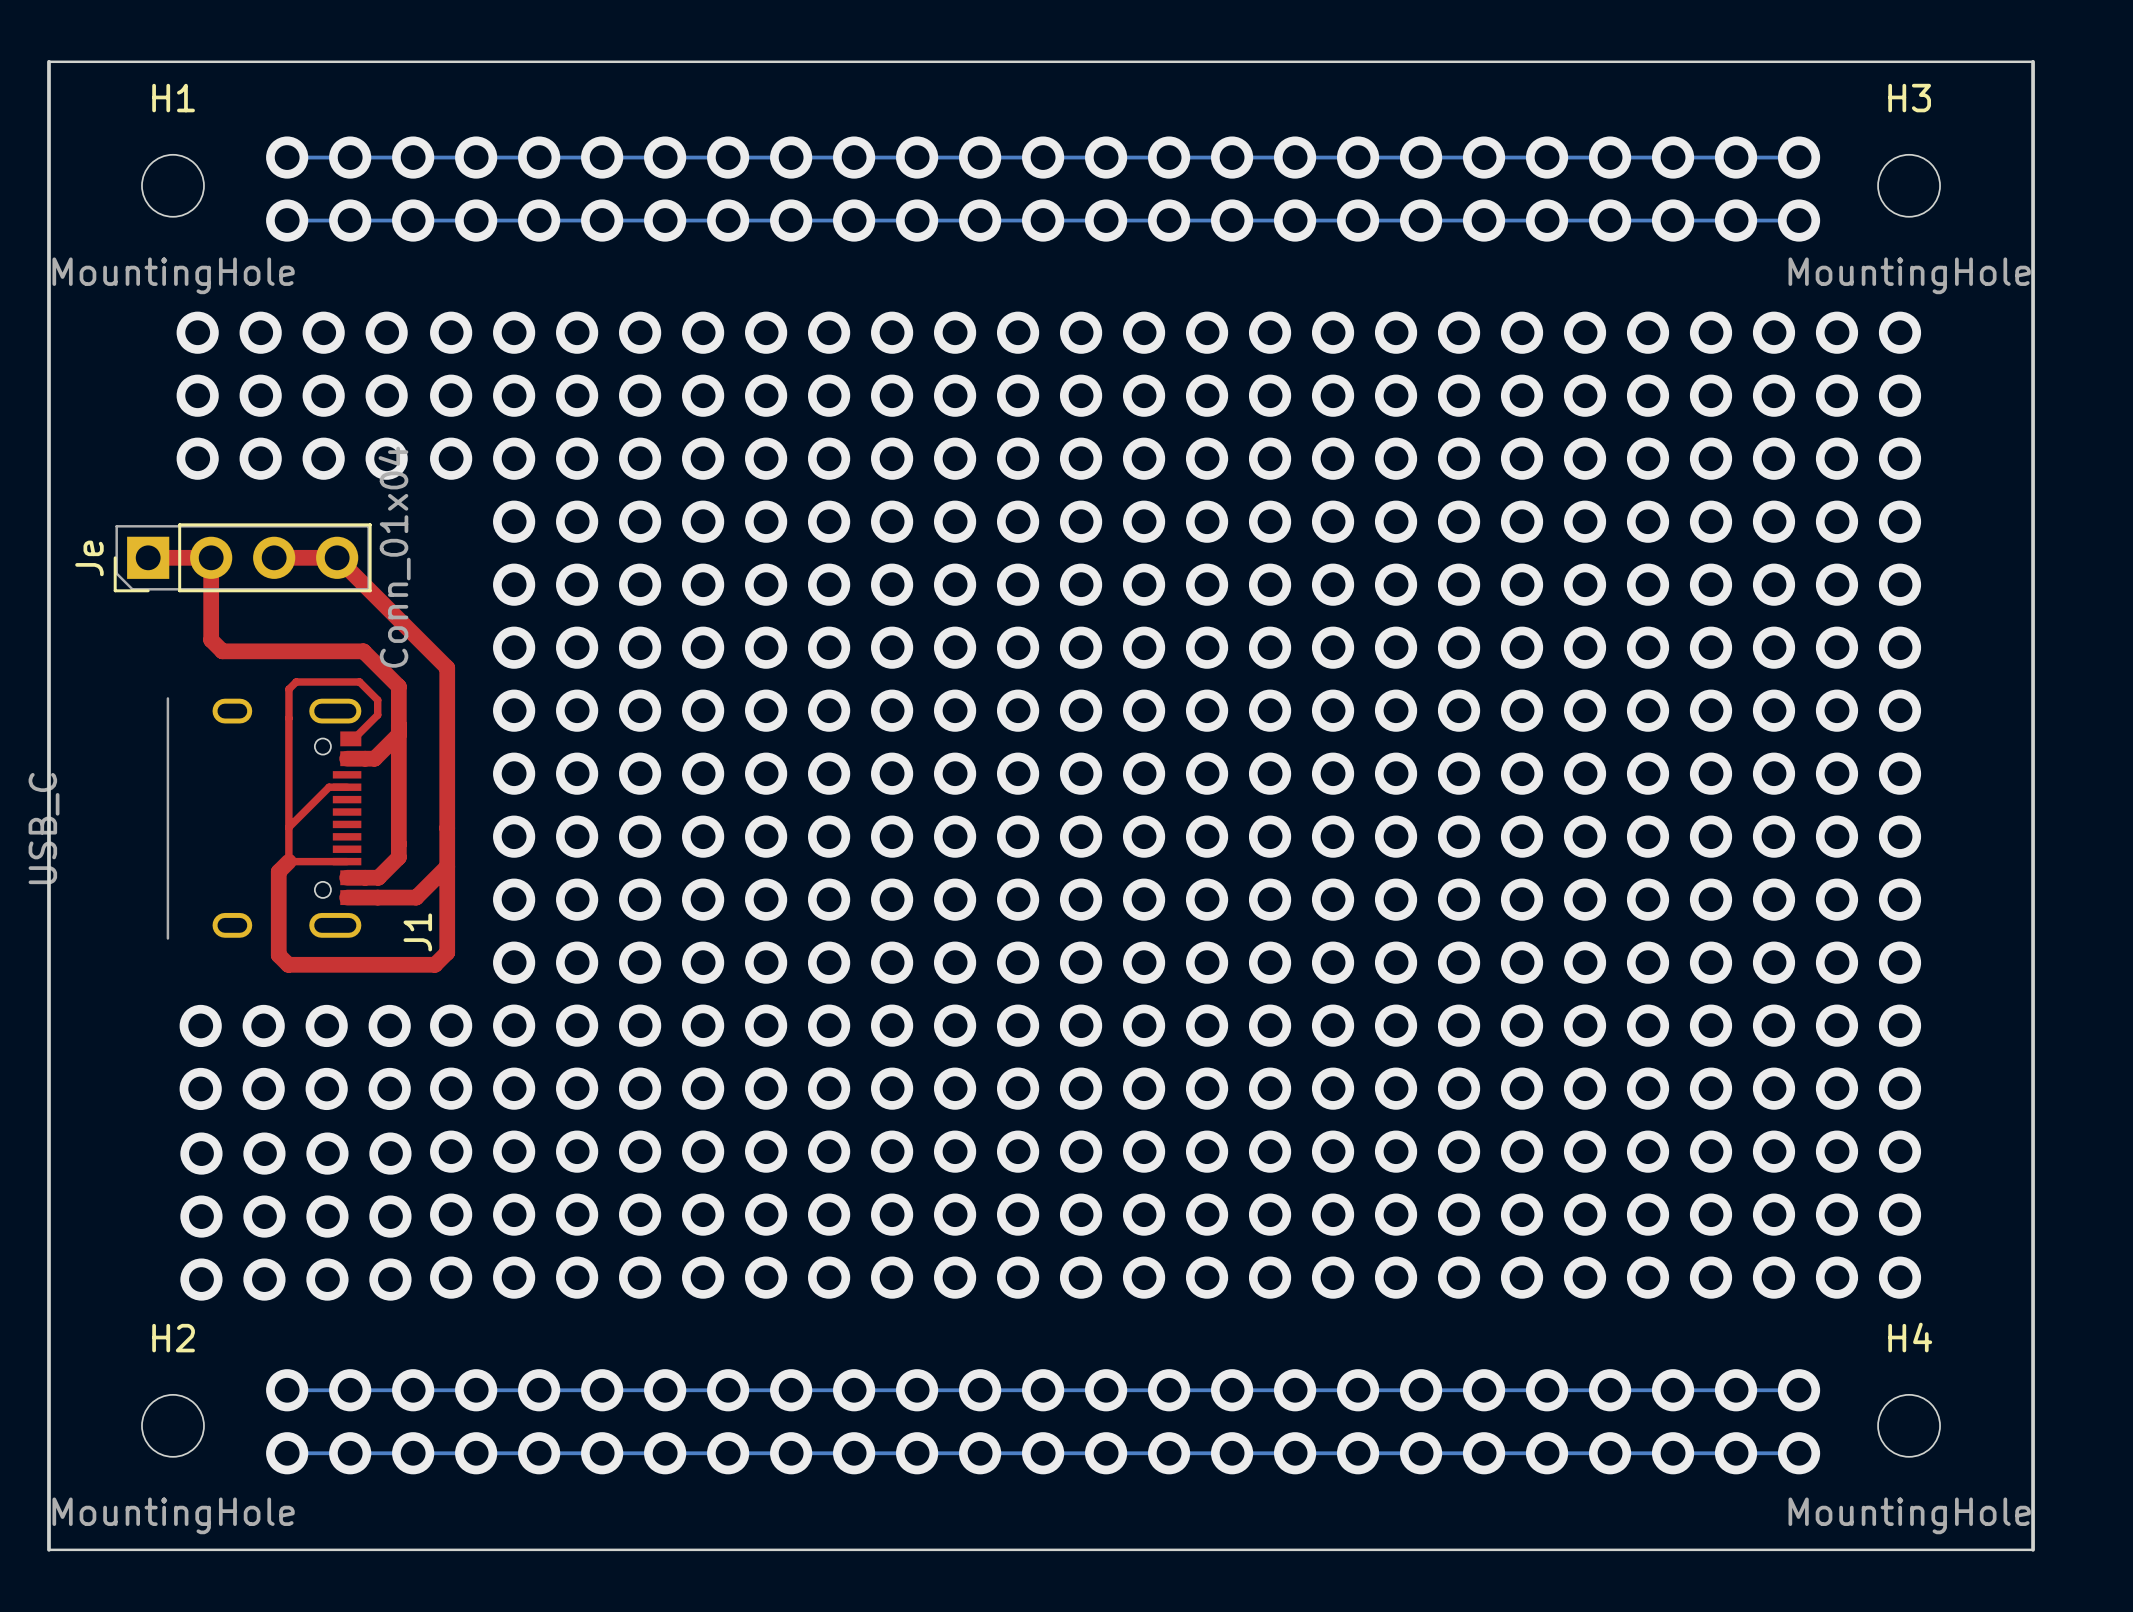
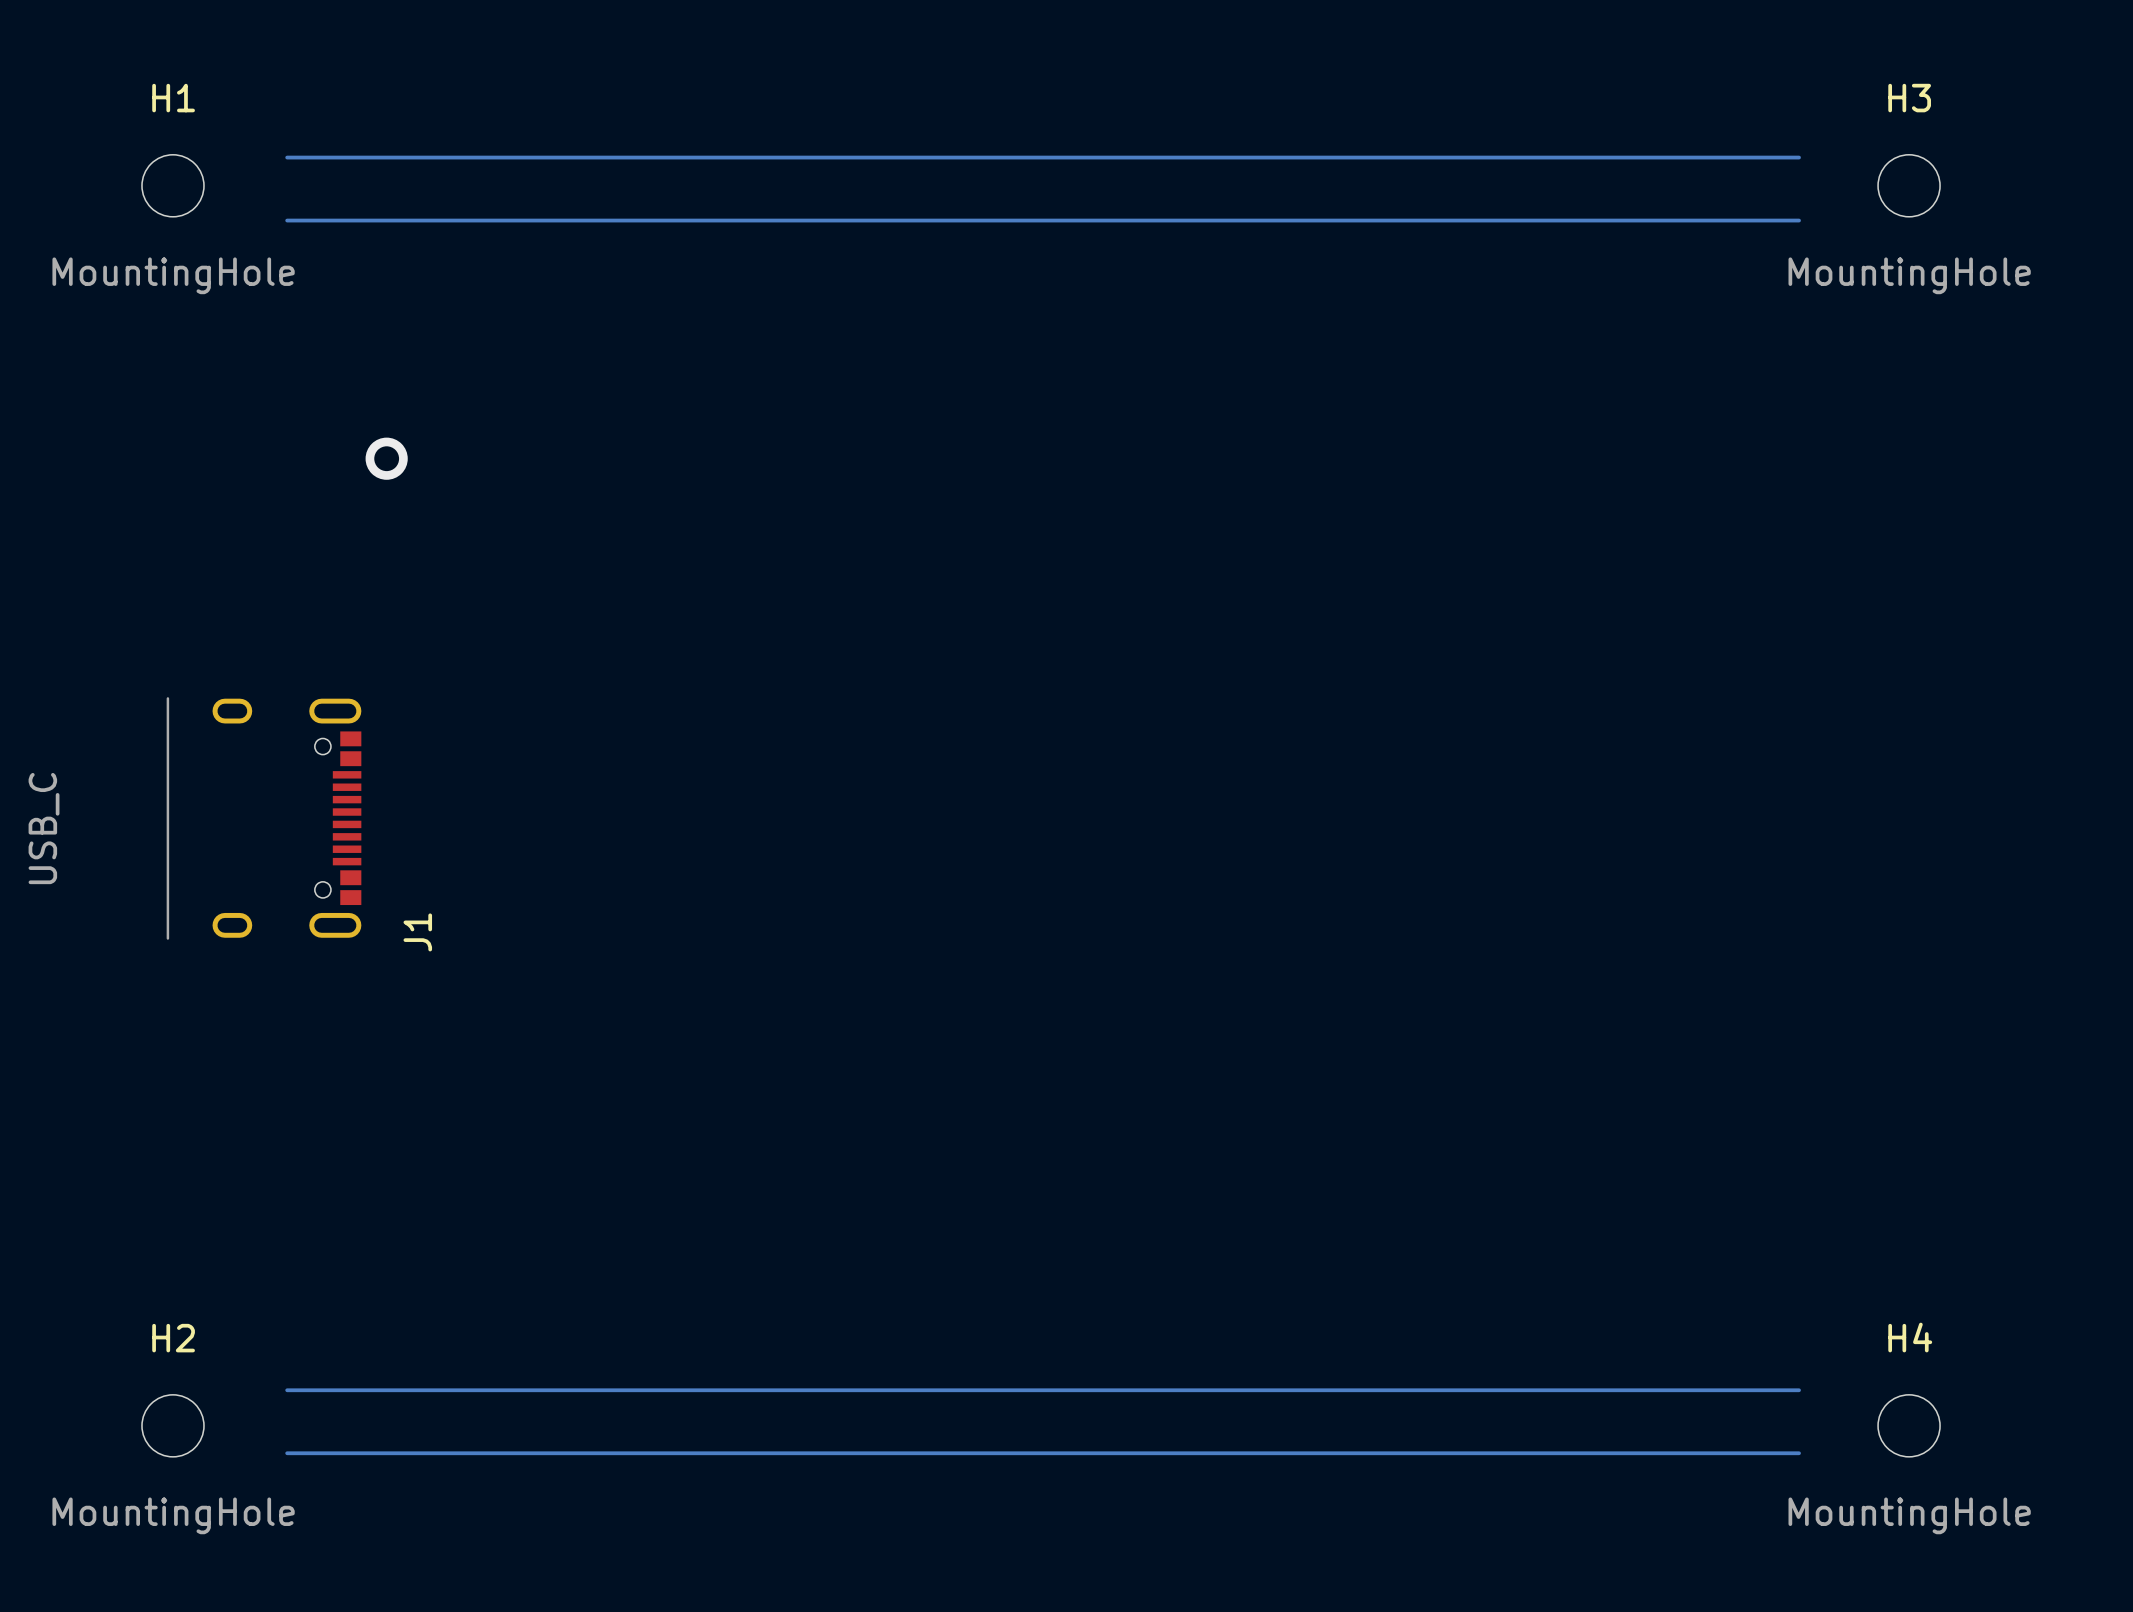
board edge: (48, 61) (48, 1549) (2033, 1549) (2033, 61) (48, 61) -> none
via: (287, 157) -> none
via: (350, 157) -> none
via: (413, 157) -> none
via: (476, 157) -> none
via: (539, 157) -> none
via: (602, 157) -> none
via: (665, 157) -> none
via: (728, 157) -> none
via: (791, 157) -> none
via: (854, 157) -> none
via: (917, 157) -> none
via: (980, 157) -> none
via: (1043, 157) -> none
via: (1106, 157) -> none
via: (1169, 157) -> none
via: (1232, 157) -> none
via: (1295, 157) -> none
via: (1358, 157) -> none
via: (1421, 157) -> none
via: (1484, 157) -> none
via: (1547, 157) -> none
via: (1610, 157) -> none
via: (1673, 157) -> none
via: (1736, 157) -> none
via: (1799, 157) -> none
via: (287, 220) -> none
via: (350, 220) -> none
via: (413, 220) -> none
via: (476, 220) -> none
via: (539, 220) -> none
via: (602, 220) -> none
via: (665, 220) -> none
via: (728, 220) -> none
via: (791, 220) -> none
via: (854, 220) -> none
via: (917, 220) -> none
via: (980, 220) -> none
via: (1043, 220) -> none
via: (1106, 220) -> none
via: (1169, 220) -> none
via: (1232, 220) -> none
via: (1295, 220) -> none
via: (1358, 220) -> none
via: (1421, 220) -> none
via: (1484, 220) -> none
via: (1547, 220) -> none
via: (1610, 220) -> none
via: (1673, 220) -> none
via: (1736, 220) -> none
via: (1799, 220) -> none
via: (197, 332) -> none
via: (260, 332) -> none
via: (323, 332) -> none
via: (386, 332) -> none
via: (451, 332) -> none
via: (514, 332) -> none
via: (577, 332) -> none
via: (640, 332) -> none
via: (703, 332) -> none
via: (766, 332) -> none
via: (829, 332) -> none
via: (892, 332) -> none
via: (955, 332) -> none
via: (1018, 332) -> none
via: (1081, 332) -> none
via: (1144, 332) -> none
via: (1207, 332) -> none
via: (1270, 332) -> none
via: (1333, 332) -> none
via: (1396, 332) -> none
via: (1459, 332) -> none
via: (1522, 332) -> none
via: (1585, 332) -> none
via: (1648, 332) -> none
via: (1711, 332) -> none
via: (1774, 332) -> none
via: (1837, 332) -> none
via: (1900, 332) -> none
via: (197, 395) -> none
via: (260, 395) -> none
via: (323, 395) -> none
via: (386, 395) -> none
via: (451, 395) -> none
via: (514, 395) -> none
via: (577, 395) -> none
via: (640, 395) -> none
via: (703, 395) -> none
via: (766, 395) -> none
via: (829, 395) -> none
via: (892, 395) -> none
via: (955, 395) -> none
via: (1018, 395) -> none
via: (1081, 395) -> none
via: (1144, 395) -> none
via: (1207, 395) -> none
via: (1270, 395) -> none
via: (1333, 395) -> none
via: (1396, 395) -> none
via: (1459, 395) -> none
via: (1522, 395) -> none
via: (1585, 395) -> none
via: (1648, 395) -> none
via: (1711, 395) -> none
via: (1774, 395) -> none
via: (1837, 395) -> none
via: (1900, 395) -> none
via: (197, 458) -> none
via: (260, 458) -> none
via: (323, 458) -> none
via: (451, 458) -> none
via: (514, 458) -> none
via: (577, 458) -> none
via: (640, 458) -> none
via: (703, 458) -> none
via: (766, 458) -> none
via: (829, 458) -> none
via: (892, 458) -> none
via: (955, 458) -> none
via: (1018, 458) -> none
via: (1081, 458) -> none
via: (1144, 458) -> none
via: (1207, 458) -> none
via: (1270, 458) -> none
via: (1333, 458) -> none
via: (1396, 458) -> none
via: (1459, 458) -> none
via: (1522, 458) -> none
via: (1585, 458) -> none
via: (1648, 458) -> none
via: (1711, 458) -> none
via: (1774, 458) -> none
via: (1837, 458) -> none
via: (1900, 458) -> none
via: (514, 521) -> none
via: (577, 521) -> none
via: (640, 521) -> none
via: (703, 521) -> none
via: (766, 521) -> none
via: (829, 521) -> none
via: (892, 521) -> none
via: (955, 521) -> none
via: (1018, 521) -> none
via: (1081, 521) -> none
via: (1144, 521) -> none
via: (1207, 521) -> none
via: (1270, 521) -> none
via: (1333, 521) -> none
via: (1396, 521) -> none
via: (1459, 521) -> none
via: (1522, 521) -> none
via: (1585, 521) -> none
via: (1648, 521) -> none
via: (1711, 521) -> none
via: (1774, 521) -> none
via: (1837, 521) -> none
via: (1900, 521) -> none
top track: (148, 557) (211, 557) (211, 640) (222, 651) (363, 651) (398, 686) (398, 857) (378, 877) (347, 877) -> none
Je: Conn_01x04 (242, 557) -> none
top track: (274, 557) (337, 557) (447, 667) (447, 952) (435, 964) (288, 964) (278, 955) (278, 871) (288, 861) -> none
via: (514, 584) -> none
via: (577, 584) -> none
via: (640, 584) -> none
via: (703, 584) -> none
via: (766, 584) -> none
via: (829, 584) -> none
via: (892, 584) -> none
via: (955, 584) -> none
via: (1018, 584) -> none
via: (1081, 584) -> none
via: (1144, 584) -> none
via: (1207, 584) -> none
via: (1270, 584) -> none
via: (1333, 584) -> none
via: (1396, 584) -> none
via: (1459, 584) -> none
via: (1522, 584) -> none
via: (1585, 584) -> none
via: (1648, 584) -> none
via: (1711, 584) -> none
via: (1774, 584) -> none
via: (1837, 584) -> none
via: (1900, 584) -> none
via: (514, 647) -> none
via: (577, 647) -> none
via: (640, 647) -> none
via: (703, 647) -> none
via: (766, 647) -> none
via: (829, 647) -> none
via: (892, 647) -> none
via: (955, 647) -> none
via: (1018, 647) -> none
via: (1081, 647) -> none
via: (1144, 647) -> none
via: (1207, 647) -> none
via: (1270, 647) -> none
via: (1333, 647) -> none
via: (1396, 647) -> none
via: (1459, 647) -> none
via: (1522, 647) -> none
via: (1585, 647) -> none
via: (1648, 647) -> none
via: (1711, 647) -> none
via: (1774, 647) -> none
via: (1837, 647) -> none
via: (1900, 647) -> none
via: (514, 710) -> none
via: (577, 710) -> none
via: (640, 710) -> none
via: (703, 710) -> none
via: (766, 710) -> none
via: (829, 710) -> none
via: (892, 710) -> none
via: (955, 710) -> none
via: (1018, 710) -> none
via: (1081, 710) -> none
via: (1144, 710) -> none
via: (1207, 710) -> none
via: (1270, 710) -> none
via: (1333, 710) -> none
via: (1396, 710) -> none
via: (1459, 710) -> none
via: (1522, 710) -> none
via: (1585, 710) -> none
via: (1648, 710) -> none
via: (1711, 710) -> none
via: (1774, 710) -> none
via: (1837, 710) -> none
via: (1900, 710) -> none
top track: (288, 718) (288, 861) -> none
top track: (288, 718) (288, 689) (296, 681) (359, 681) (377, 700) (377, 715) (353, 738) (350, 738) -> none
top track: (398, 734) (374, 758) (347, 758) -> none
via: (514, 773) -> none
via: (577, 773) -> none
via: (640, 773) -> none
via: (703, 773) -> none
via: (766, 773) -> none
via: (829, 773) -> none
via: (892, 773) -> none
via: (955, 773) -> none
via: (1018, 773) -> none
via: (1081, 773) -> none
via: (1144, 773) -> none
via: (1207, 773) -> none
via: (1270, 773) -> none
via: (1333, 773) -> none
via: (1396, 773) -> none
via: (1459, 773) -> none
via: (1522, 773) -> none
via: (1585, 773) -> none
via: (1648, 773) -> none
via: (1711, 773) -> none
via: (1774, 773) -> none
via: (1837, 773) -> none
via: (1900, 773) -> none
top track: (347, 787) (329, 787) (288, 827) -> none
via: (514, 836) -> none
via: (577, 836) -> none
via: (640, 836) -> none
via: (703, 836) -> none
via: (766, 836) -> none
via: (829, 836) -> none
via: (892, 836) -> none
via: (955, 836) -> none
via: (1018, 836) -> none
via: (1081, 836) -> none
via: (1144, 836) -> none
via: (1207, 836) -> none
via: (1270, 836) -> none
via: (1333, 836) -> none
via: (1396, 836) -> none
via: (1459, 836) -> none
via: (1522, 836) -> none
via: (1585, 836) -> none
via: (1648, 836) -> none
via: (1711, 836) -> none
via: (1774, 836) -> none
via: (1837, 836) -> none
via: (1900, 836) -> none
top track: (288, 861) (347, 861) -> none
top track: (447, 866) (416, 897) (347, 897) -> none
via: (514, 899) -> none
via: (577, 899) -> none
via: (640, 899) -> none
via: (703, 899) -> none
via: (766, 899) -> none
via: (829, 899) -> none
via: (892, 899) -> none
via: (955, 899) -> none
via: (1018, 899) -> none
via: (1081, 899) -> none
via: (1144, 899) -> none
via: (1207, 899) -> none
via: (1270, 899) -> none
via: (1333, 899) -> none
via: (1396, 899) -> none
via: (1459, 899) -> none
via: (1522, 899) -> none
via: (1585, 899) -> none
via: (1648, 899) -> none
via: (1711, 899) -> none
via: (1774, 899) -> none
via: (1837, 899) -> none
via: (1900, 899) -> none
via: (514, 962) -> none
via: (577, 962) -> none
via: (640, 962) -> none
via: (703, 962) -> none
via: (766, 962) -> none
via: (829, 962) -> none
via: (892, 962) -> none
via: (955, 962) -> none
via: (1018, 962) -> none
via: (1081, 962) -> none
via: (1144, 962) -> none
via: (1207, 962) -> none
via: (1270, 962) -> none
via: (1333, 962) -> none
via: (1396, 962) -> none
via: (1459, 962) -> none
via: (1522, 962) -> none
via: (1585, 962) -> none
via: (1648, 962) -> none
via: (1711, 962) -> none
via: (1774, 962) -> none
via: (1837, 962) -> none
via: (1900, 962) -> none
via: (200, 1025) -> none
via: (263, 1025) -> none
via: (326, 1025) -> none
via: (389, 1025) -> none
via: (451, 1025) -> none
via: (514, 1025) -> none
via: (577, 1025) -> none
via: (640, 1025) -> none
via: (703, 1025) -> none
via: (766, 1025) -> none
via: (829, 1025) -> none
via: (892, 1025) -> none
via: (955, 1025) -> none
via: (1018, 1025) -> none
via: (1081, 1025) -> none
via: (1144, 1025) -> none
via: (1207, 1025) -> none
via: (1270, 1025) -> none
via: (1333, 1025) -> none
via: (1396, 1025) -> none
via: (1459, 1025) -> none
via: (1522, 1025) -> none
via: (1585, 1025) -> none
via: (1648, 1025) -> none
via: (1711, 1025) -> none
via: (1774, 1025) -> none
via: (1837, 1025) -> none
via: (1900, 1025) -> none
via: (200, 1088) -> none
via: (263, 1088) -> none
via: (326, 1088) -> none
via: (389, 1088) -> none
via: (451, 1088) -> none
via: (514, 1088) -> none
via: (577, 1088) -> none
via: (640, 1088) -> none
via: (703, 1088) -> none
via: (766, 1088) -> none
via: (829, 1088) -> none
via: (892, 1088) -> none
via: (955, 1088) -> none
via: (1018, 1088) -> none
via: (1081, 1088) -> none
via: (1144, 1088) -> none
via: (1207, 1088) -> none
via: (1270, 1088) -> none
via: (1333, 1088) -> none
via: (1396, 1088) -> none
via: (1459, 1088) -> none
via: (1522, 1088) -> none
via: (1585, 1088) -> none
via: (1648, 1088) -> none
via: (1711, 1088) -> none
via: (1774, 1088) -> none
via: (1837, 1088) -> none
via: (1900, 1088) -> none
via: (451, 1151) -> none
via: (514, 1151) -> none
via: (577, 1151) -> none
via: (640, 1151) -> none
via: (703, 1151) -> none
via: (766, 1151) -> none
via: (829, 1151) -> none
via: (892, 1151) -> none
via: (955, 1151) -> none
via: (1018, 1151) -> none
via: (1081, 1151) -> none
via: (1144, 1151) -> none
via: (1207, 1151) -> none
via: (1270, 1151) -> none
via: (1333, 1151) -> none
via: (1396, 1151) -> none
via: (1459, 1151) -> none
via: (1522, 1151) -> none
via: (1585, 1151) -> none
via: (1648, 1151) -> none
via: (1711, 1151) -> none
via: (1774, 1151) -> none
via: (1837, 1151) -> none
via: (1900, 1151) -> none
via: (201, 1153) -> none
via: (264, 1153) -> none
via: (327, 1153) -> none
via: (390, 1153) -> none
via: (451, 1214) -> none
via: (514, 1214) -> none
via: (577, 1214) -> none
via: (640, 1214) -> none
via: (703, 1214) -> none
via: (766, 1214) -> none
via: (829, 1214) -> none
via: (892, 1214) -> none
via: (955, 1214) -> none
via: (1018, 1214) -> none
via: (1081, 1214) -> none
via: (1144, 1214) -> none
via: (1207, 1214) -> none
via: (1270, 1214) -> none
via: (1333, 1214) -> none
via: (1396, 1214) -> none
via: (1459, 1214) -> none
via: (1522, 1214) -> none
via: (1585, 1214) -> none
via: (1648, 1214) -> none
via: (1711, 1214) -> none
via: (1774, 1214) -> none
via: (1837, 1214) -> none
via: (1900, 1214) -> none
via: (201, 1216) -> none
via: (264, 1216) -> none
via: (327, 1216) -> none
via: (390, 1216) -> none
via: (451, 1277) -> none
via: (514, 1277) -> none
via: (577, 1277) -> none
via: (640, 1277) -> none
via: (703, 1277) -> none
via: (766, 1277) -> none
via: (829, 1277) -> none
via: (892, 1277) -> none
via: (955, 1277) -> none
via: (1018, 1277) -> none
via: (1081, 1277) -> none
via: (1144, 1277) -> none
via: (1207, 1277) -> none
via: (1270, 1277) -> none
via: (1333, 1277) -> none
via: (1396, 1277) -> none
via: (1459, 1277) -> none
via: (1522, 1277) -> none
via: (1585, 1277) -> none
via: (1648, 1277) -> none
via: (1711, 1277) -> none
via: (1774, 1277) -> none
via: (1837, 1277) -> none
via: (1900, 1277) -> none
via: (201, 1279) -> none
via: (264, 1279) -> none
via: (327, 1279) -> none
via: (390, 1279) -> none
via: (287, 1390) -> none
via: (350, 1390) -> none
via: (413, 1390) -> none
via: (476, 1390) -> none
via: (539, 1390) -> none
via: (602, 1390) -> none
via: (665, 1390) -> none
via: (728, 1390) -> none
via: (791, 1390) -> none
via: (854, 1390) -> none
via: (917, 1390) -> none
via: (980, 1390) -> none
via: (1043, 1390) -> none
via: (1106, 1390) -> none
via: (1169, 1390) -> none
via: (1232, 1390) -> none
via: (1295, 1390) -> none
via: (1358, 1390) -> none
via: (1421, 1390) -> none
via: (1484, 1390) -> none
via: (1547, 1390) -> none
via: (1610, 1390) -> none
via: (1673, 1390) -> none
via: (1736, 1390) -> none
via: (1799, 1390) -> none
via: (287, 1453) -> none
via: (350, 1453) -> none
via: (413, 1453) -> none
via: (476, 1453) -> none
via: (539, 1453) -> none
via: (602, 1453) -> none
via: (665, 1453) -> none
via: (728, 1453) -> none
via: (791, 1453) -> none
via: (854, 1453) -> none
via: (917, 1453) -> none
via: (980, 1453) -> none
via: (1043, 1453) -> none
via: (1106, 1453) -> none
via: (1169, 1453) -> none
via: (1232, 1453) -> none
via: (1295, 1453) -> none
via: (1358, 1453) -> none
via: (1421, 1453) -> none
via: (1484, 1453) -> none
via: (1547, 1453) -> none
via: (1610, 1453) -> none
via: (1673, 1453) -> none
via: (1736, 1453) -> none
via: (1799, 1453) -> none

